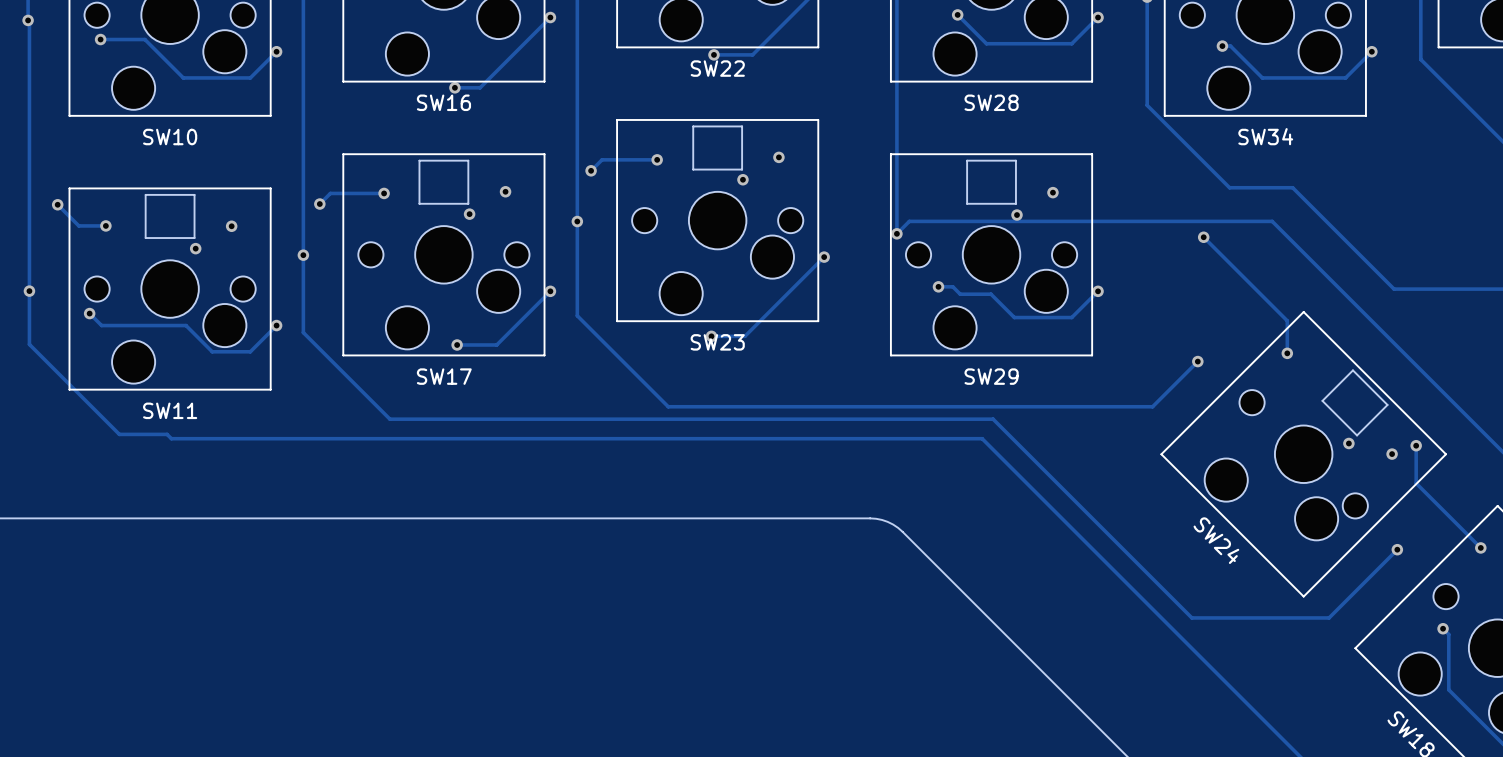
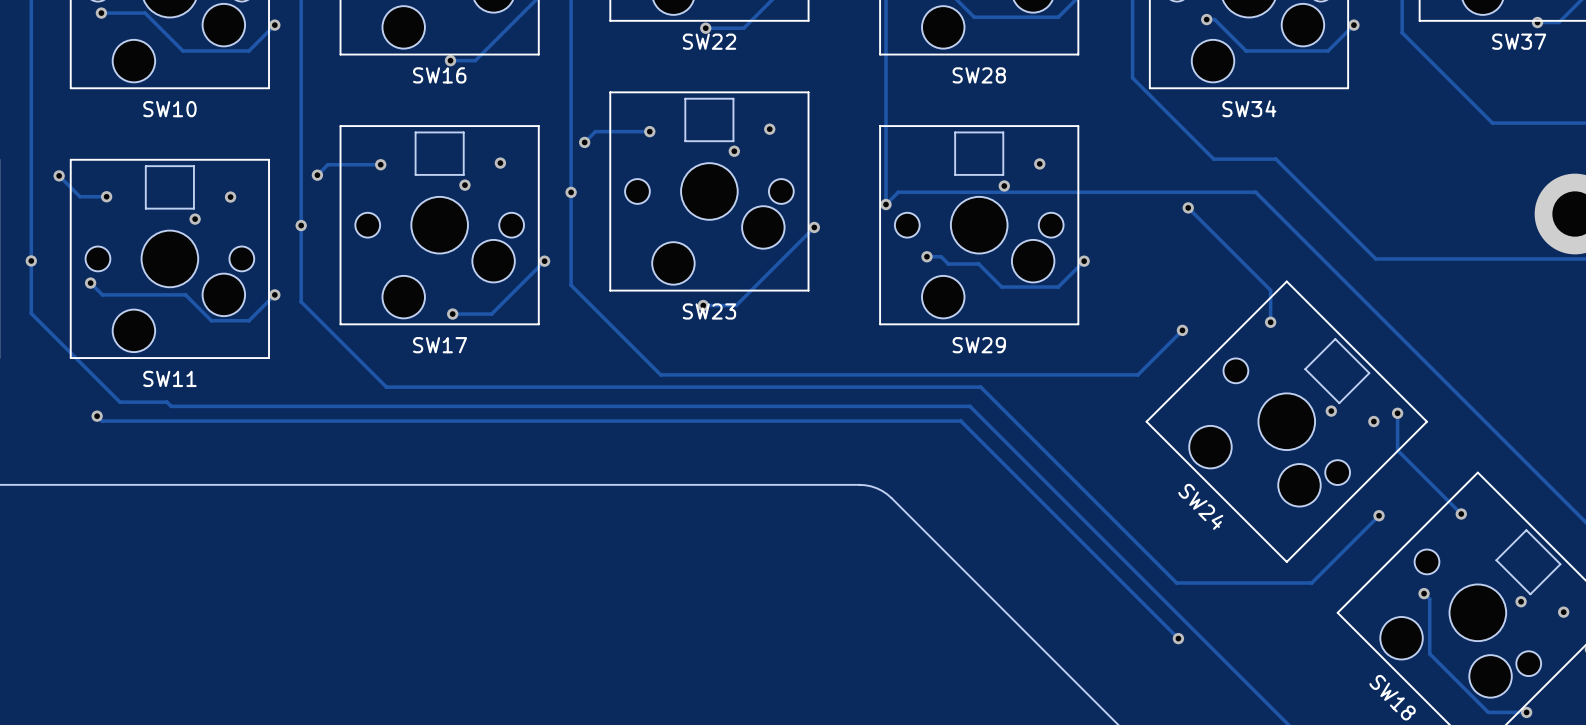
track: none -> (97, 416) (102, 421) (960, 421) (1178, 638)
via: none -> (97, 416)
via: none -> (1178, 638)

